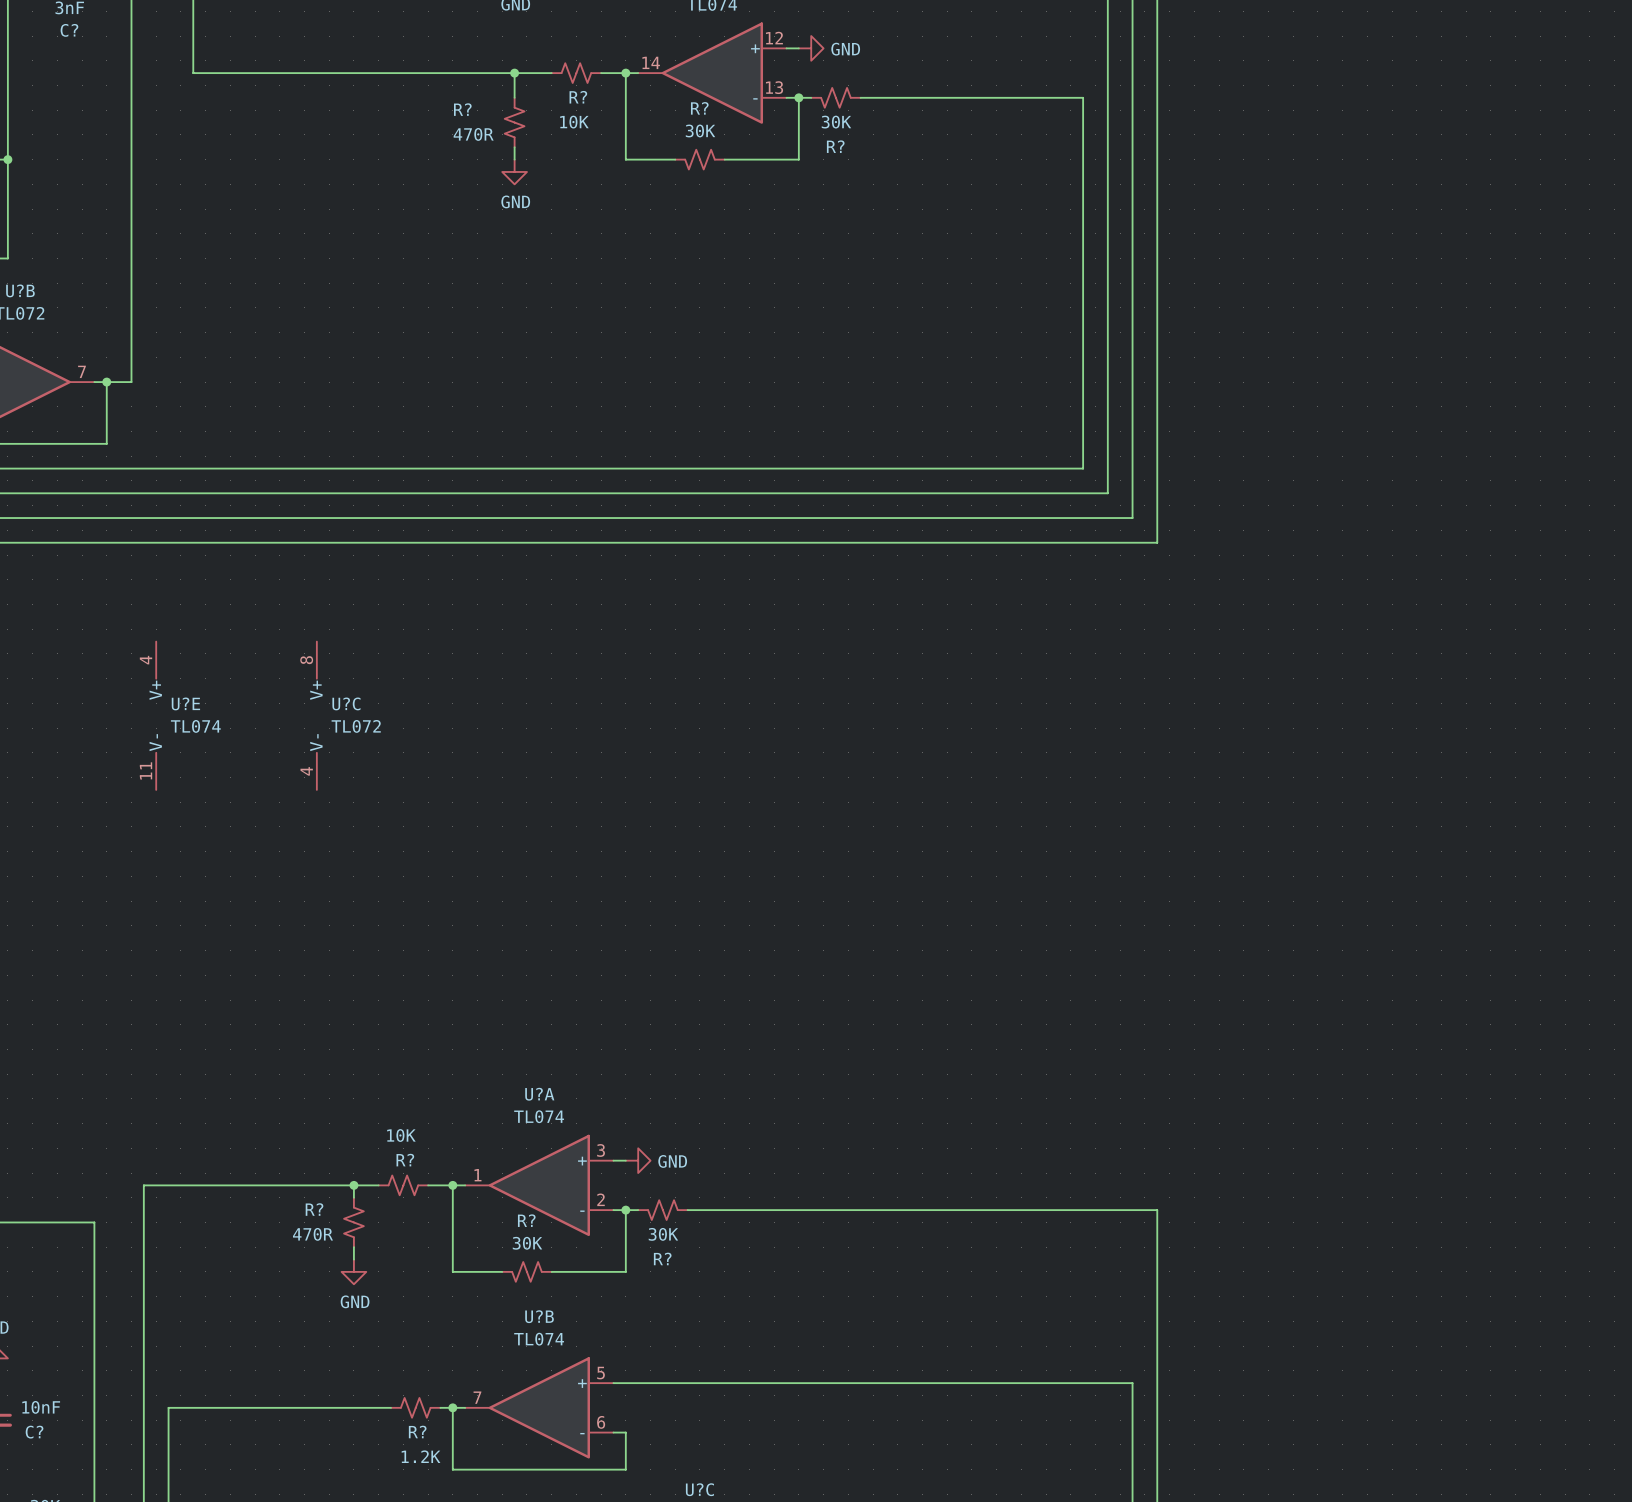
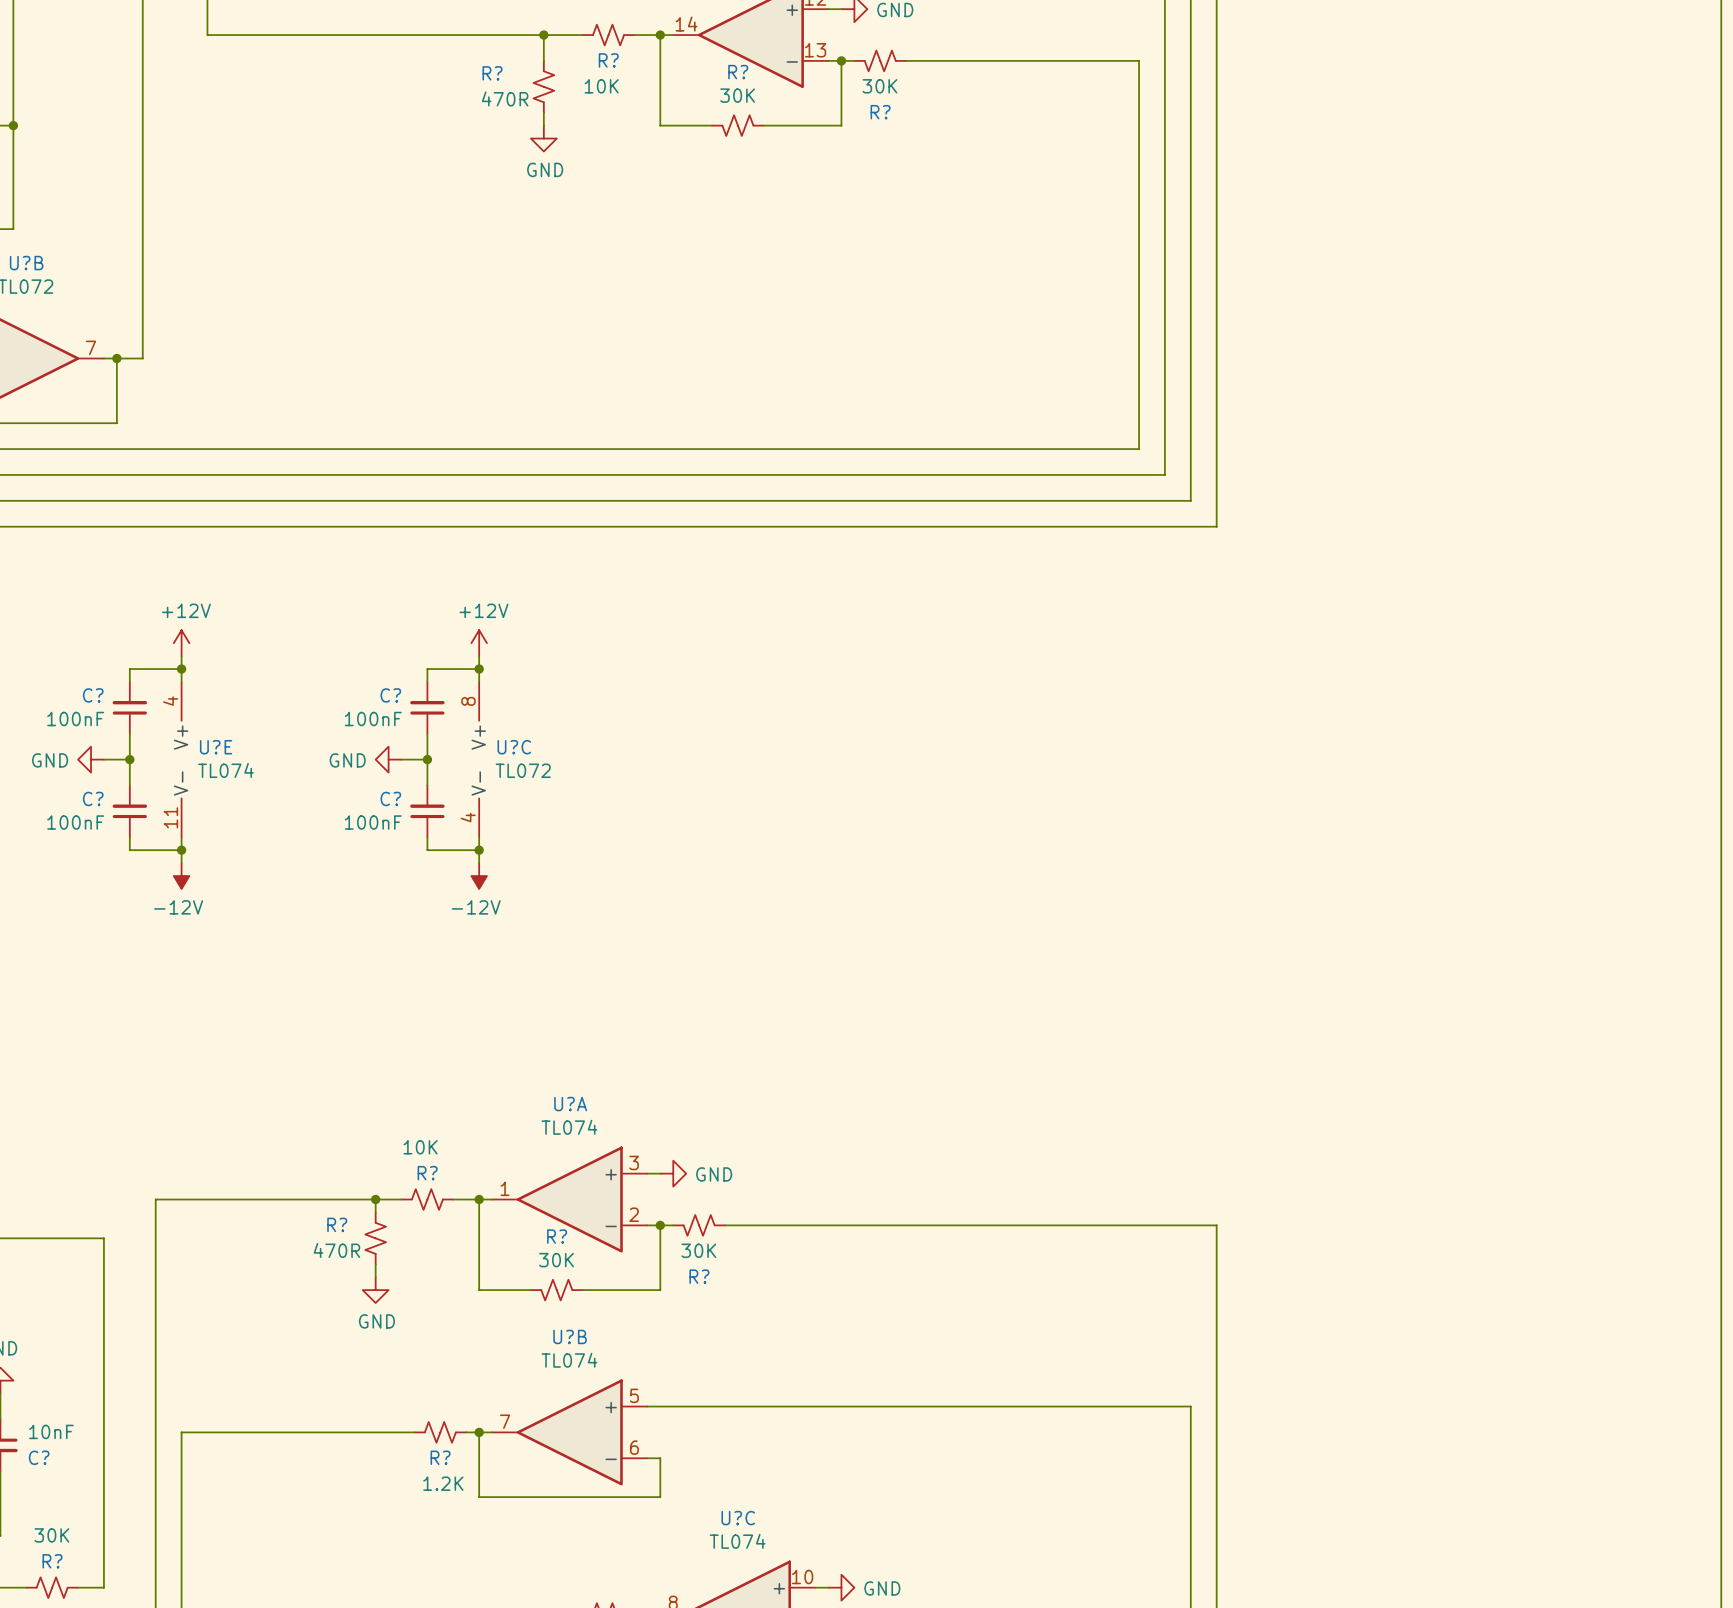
power symbol: none -> +12V (181, 643)
power symbol: none -> +12V (479, 643)
wire: none -> (181, 656) (181, 681)
wire: none -> (479, 656) (479, 681)
wire: none -> (181, 669) (129, 669) (129, 681)
junction: none -> (181, 669)
wire: none -> (479, 669) (427, 669) (427, 681)
junction: none -> (479, 669)
C?: none -> 100nF (129, 707)
U?E position: (156, 715) -> (181, 759)
U?C position: (316, 715) -> (479, 759)
C?: none -> 100nF (427, 707)
wire: none -> (129, 733) (129, 785)
wire: none -> (427, 733) (427, 785)
power symbol: none -> GND (91, 759)
wire: none -> (103, 759) (129, 759)
junction: none -> (129, 759)
power symbol: none -> GND (388, 759)
wire: none -> (401, 759) (427, 759)
junction: none -> (427, 759)
C?: none -> 100nF (129, 811)
C?: none -> 100nF (427, 811)
wire: none -> (129, 837) (129, 850) (181, 850)
wire: none -> (181, 837) (181, 863)
wire: none -> (427, 837) (427, 850) (479, 850)
wire: none -> (479, 837) (479, 863)
junction: none -> (181, 850)
junction: none -> (479, 850)
power symbol: none -> -12V (181, 876)
power symbol: none -> -12V (479, 876)

